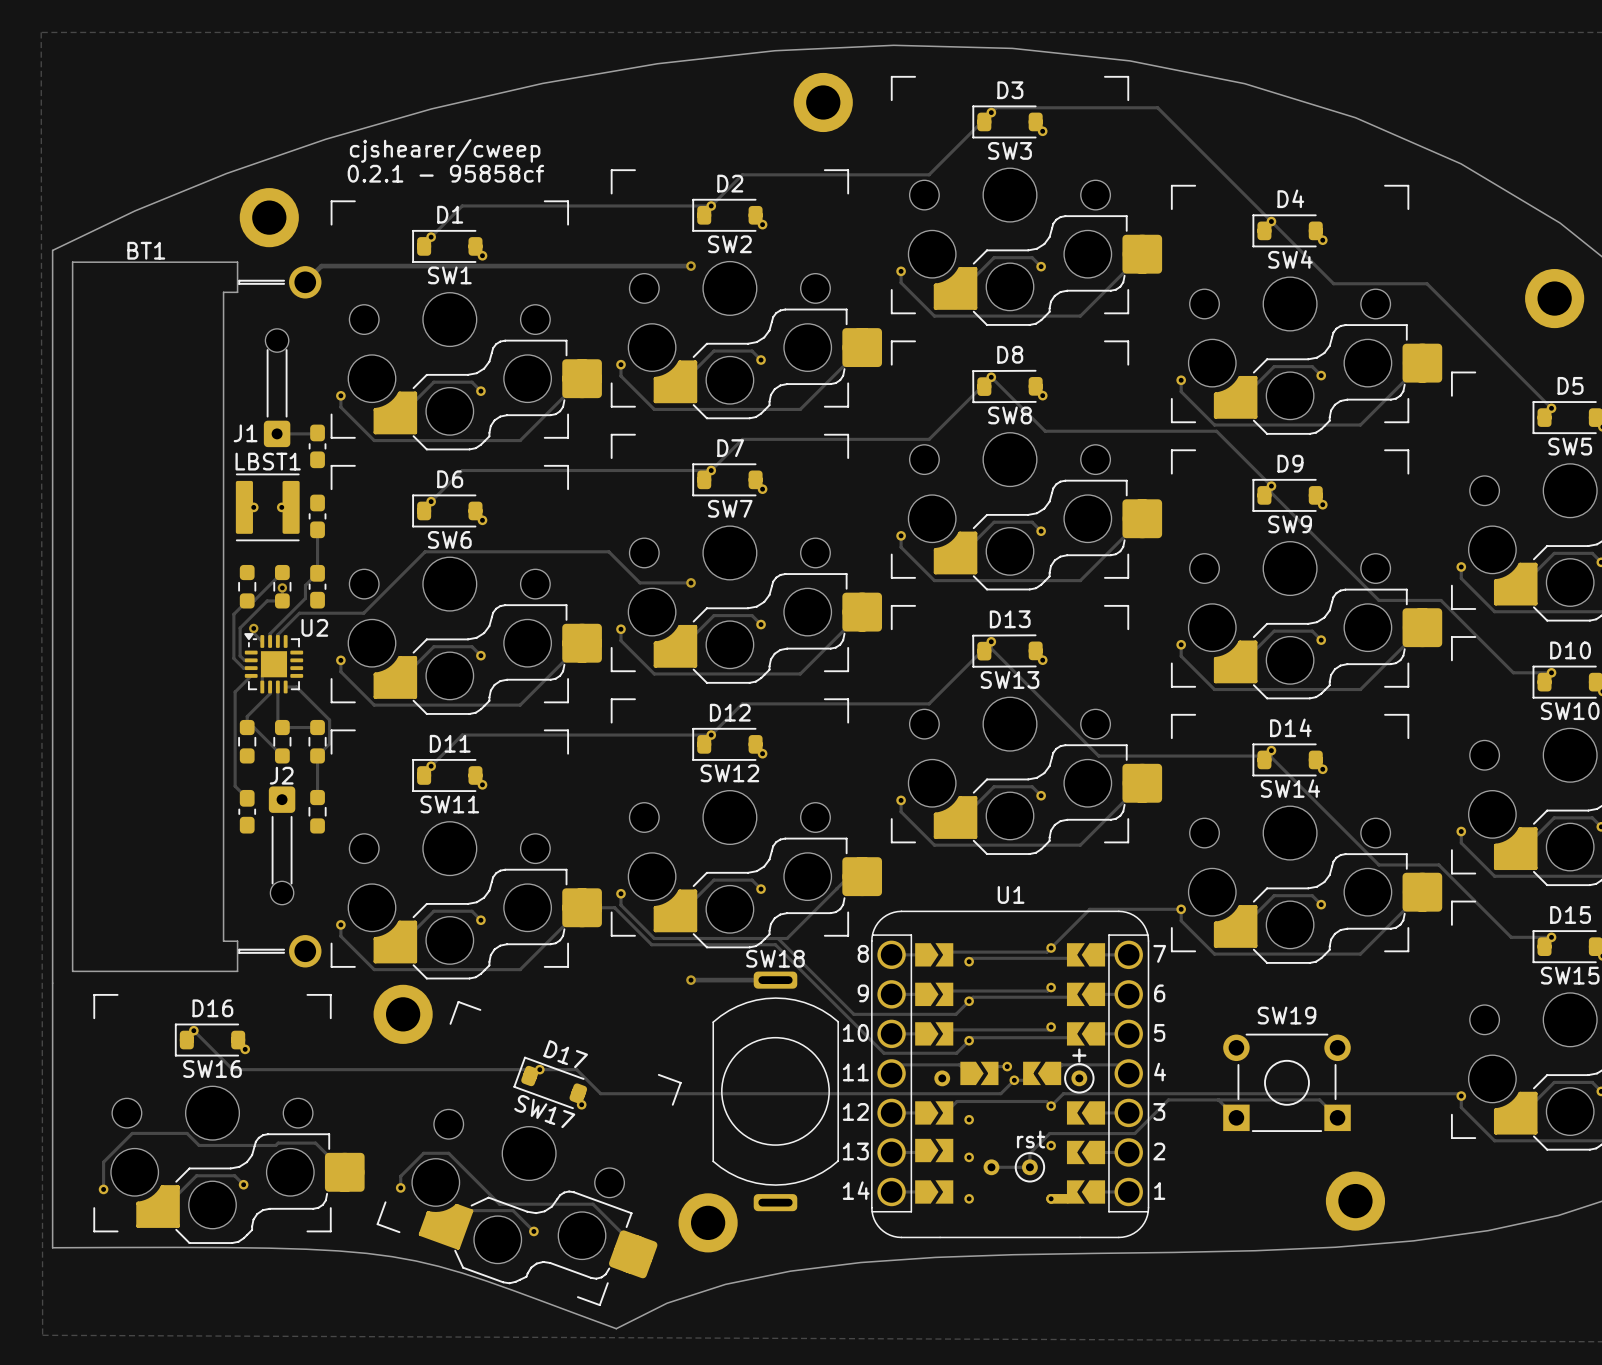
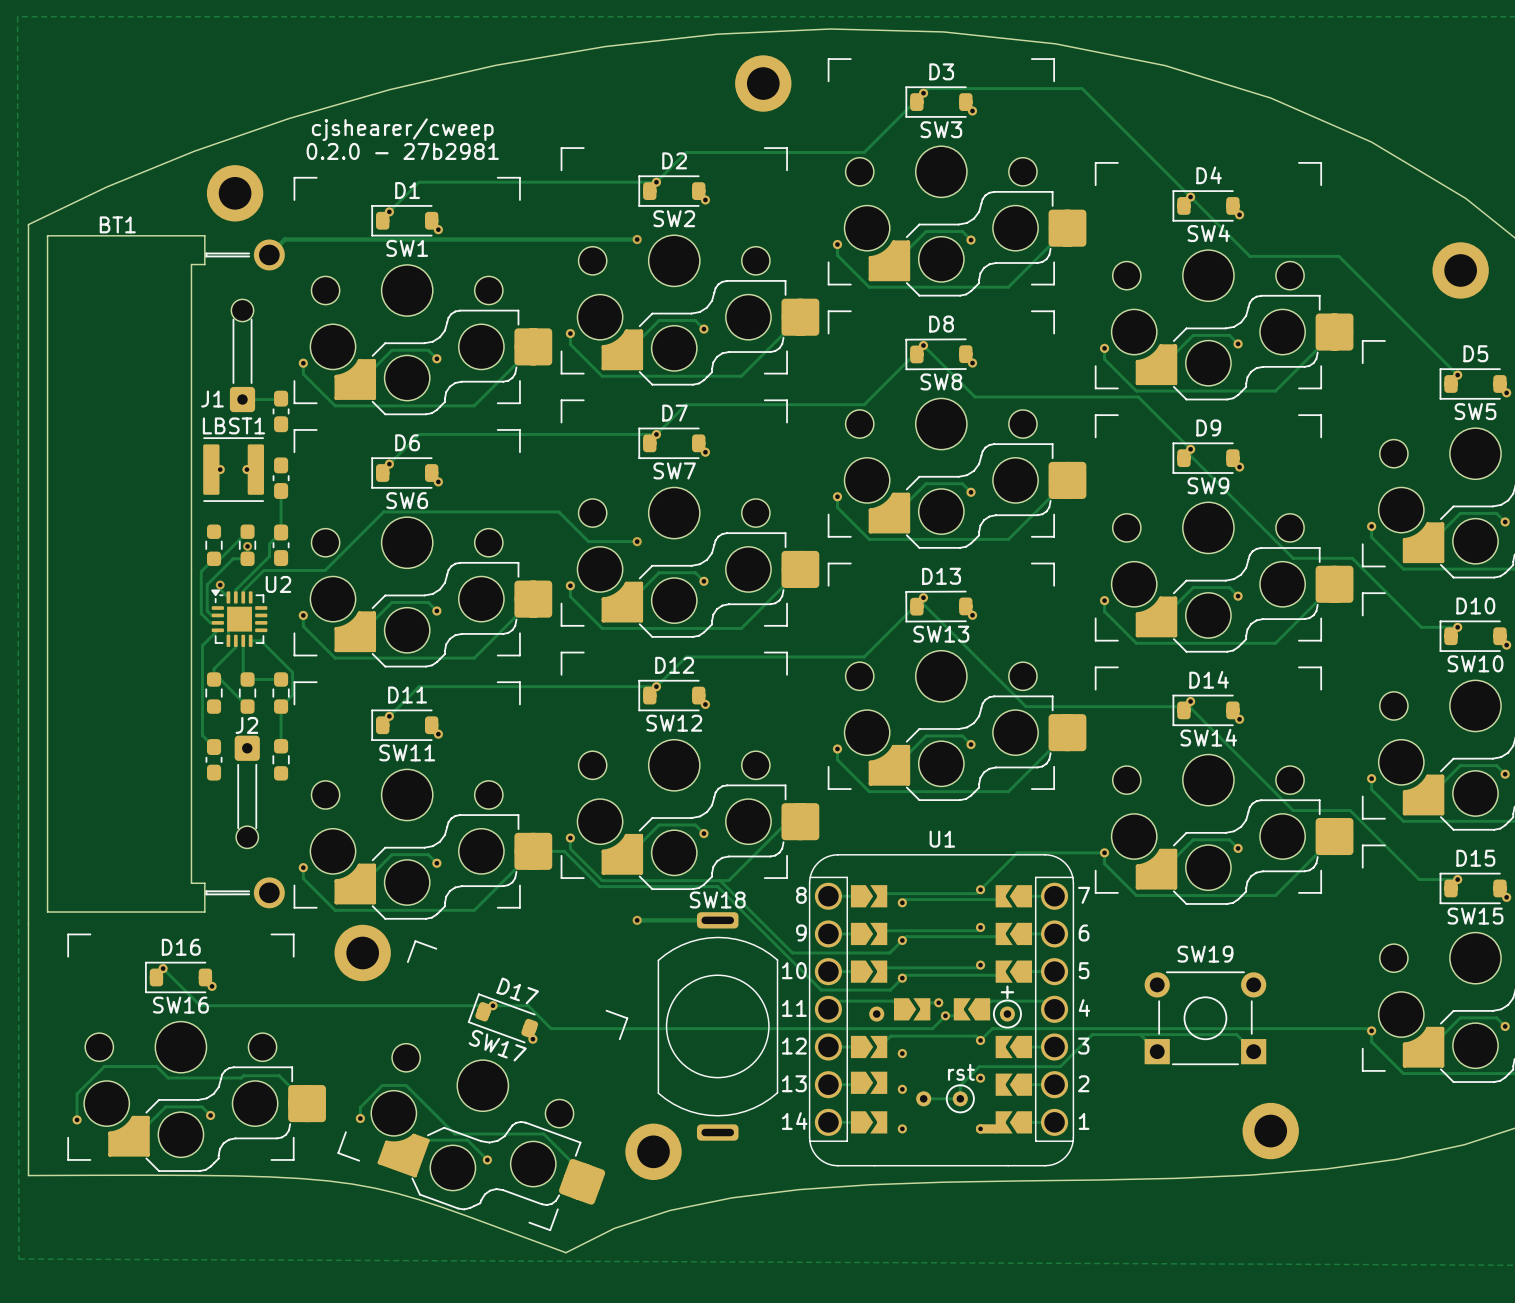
text: 0.2.1 - 95858cf (445, 173) -> 0.2.0 - 27b2981 (402, 151)

